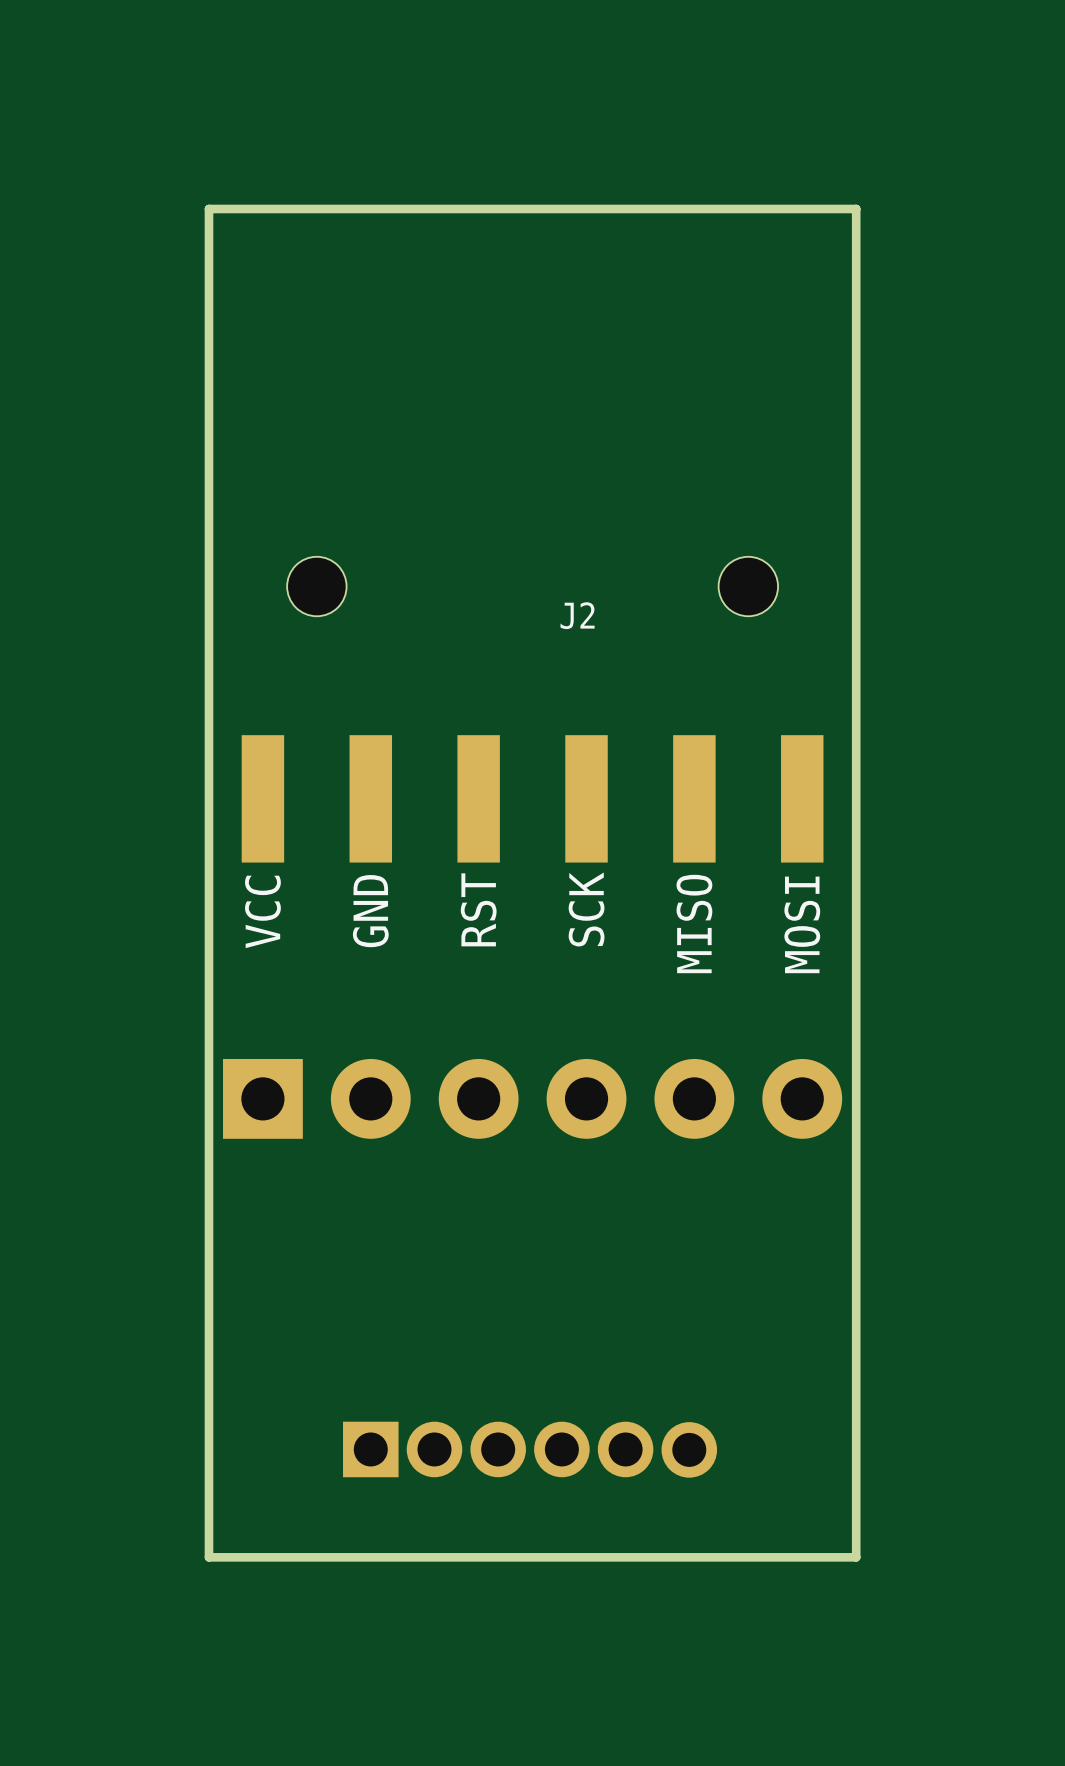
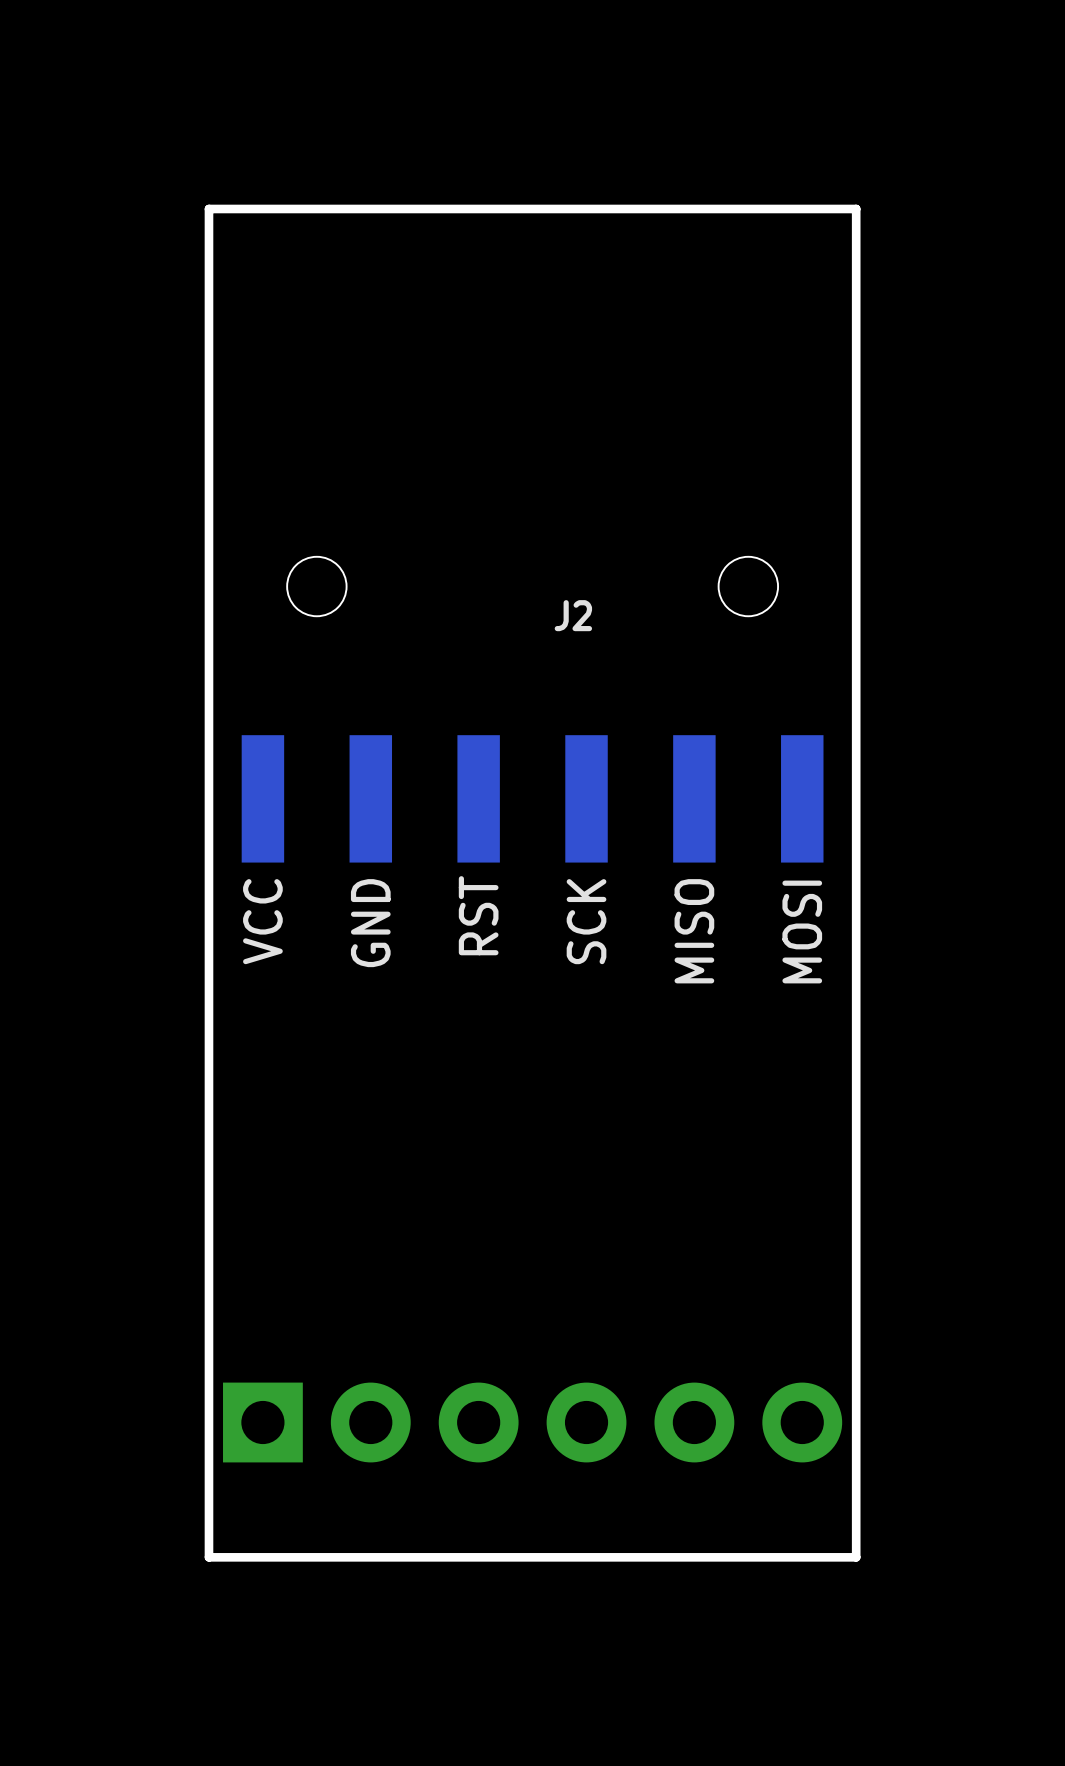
part: (532, 1098) -> none
part footprint: [343, 1421, 718, 1478] -> [223, 1382, 843, 1463]

